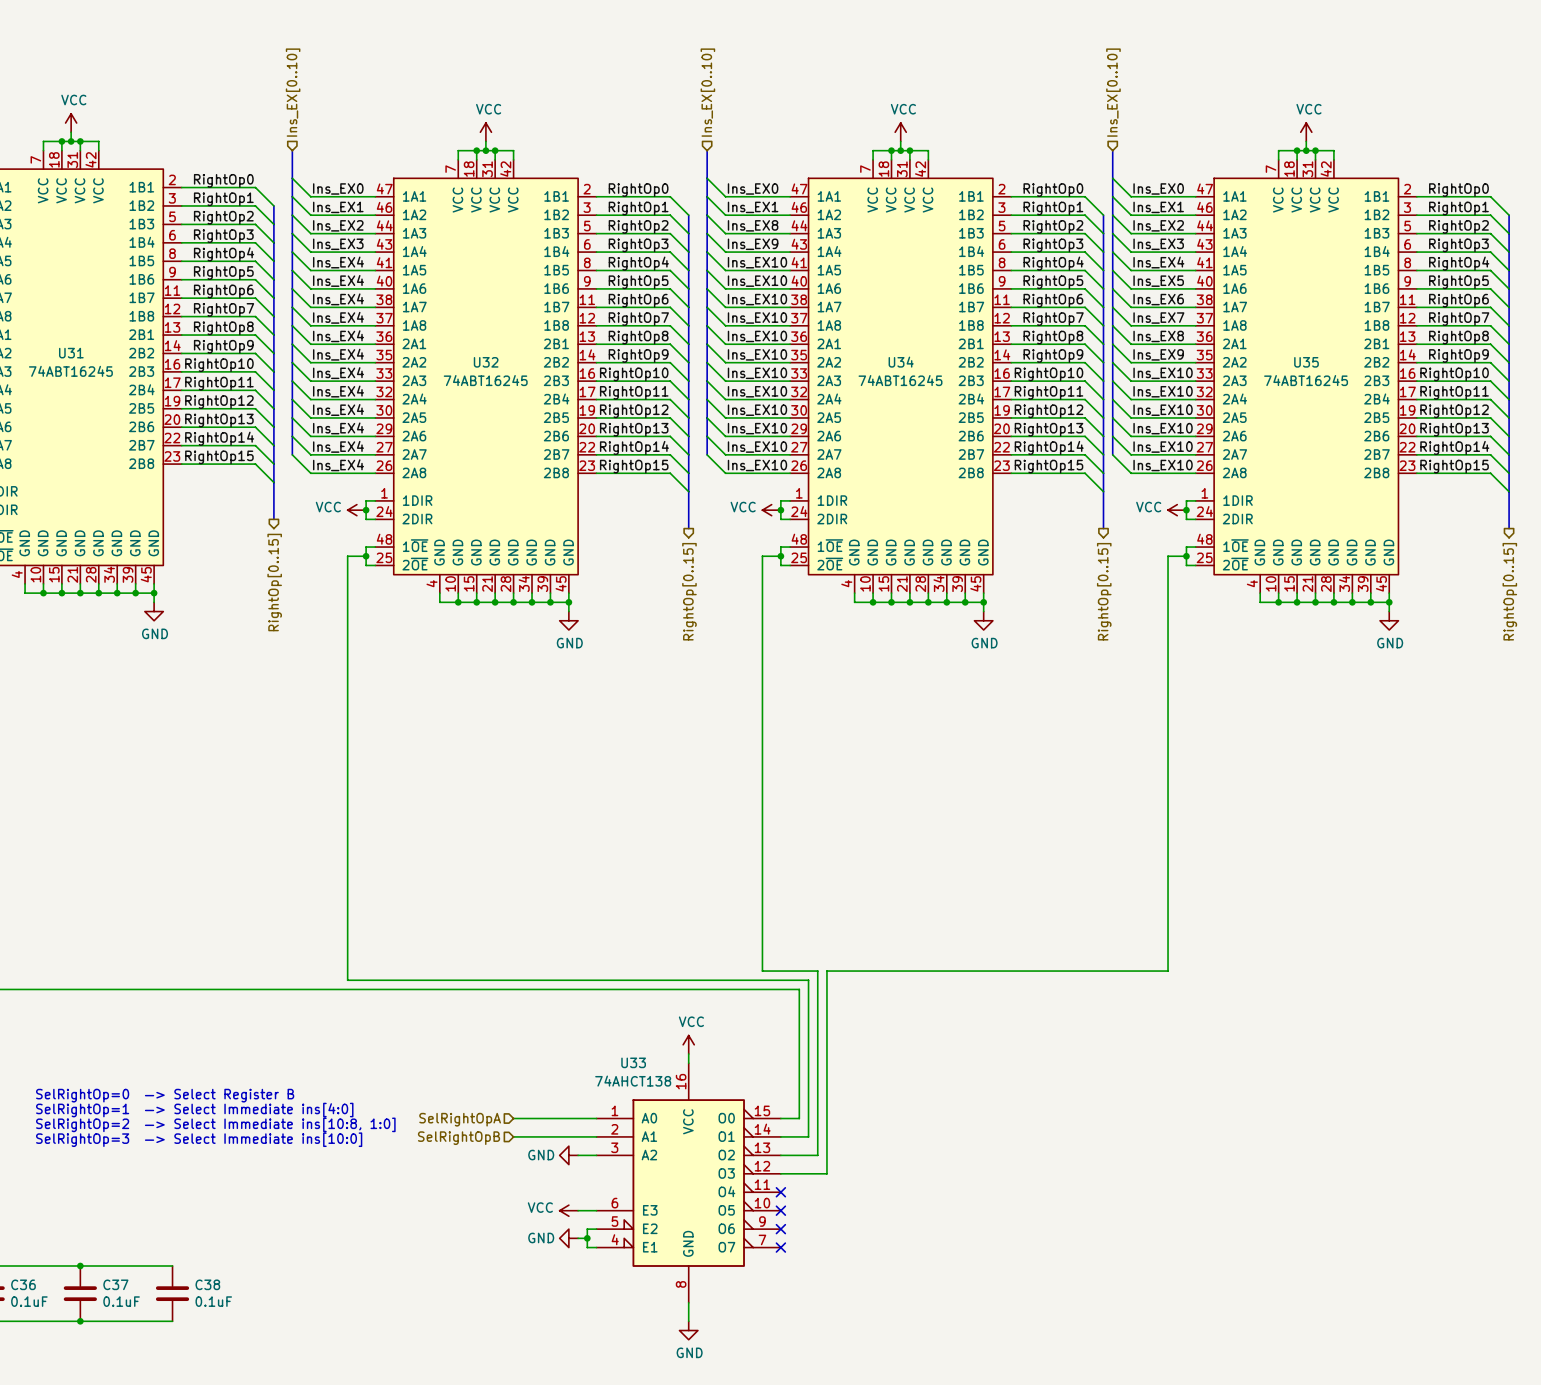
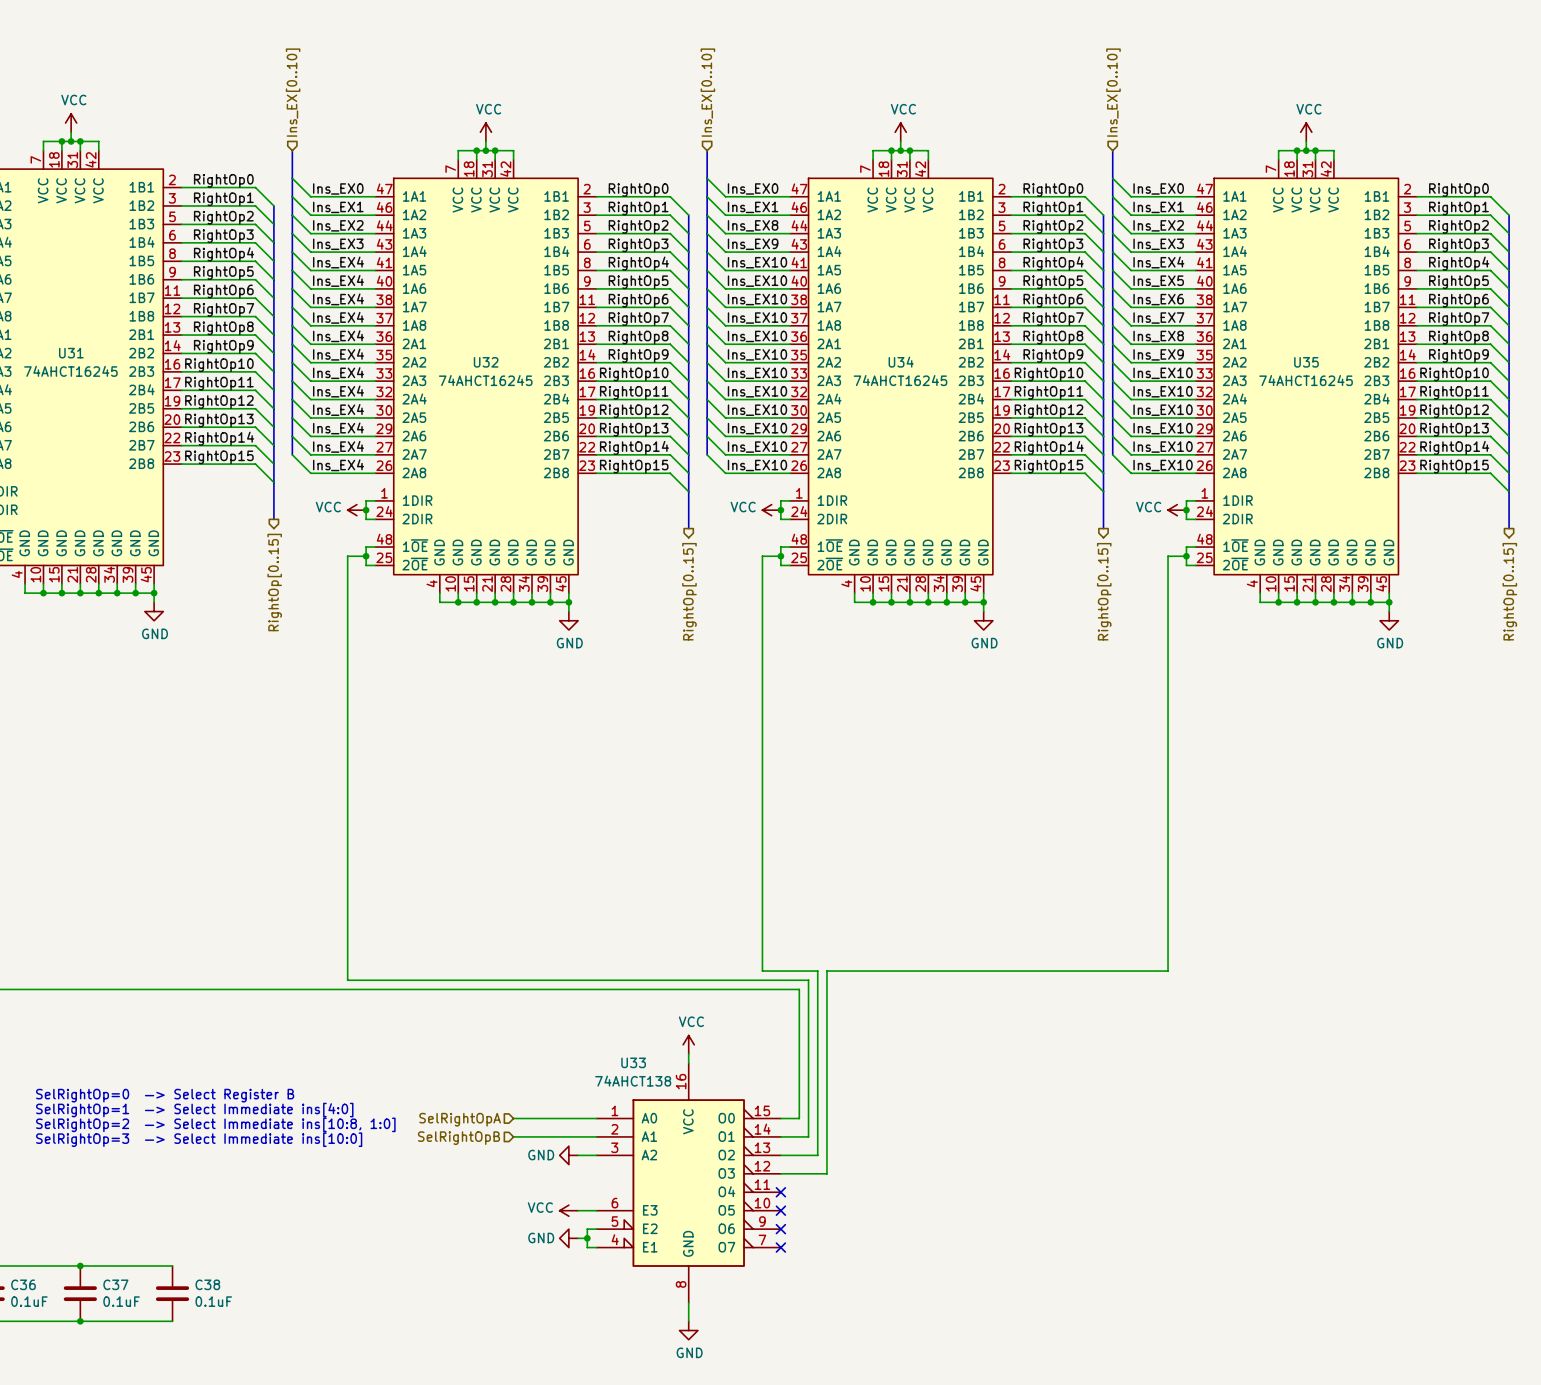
U31 value: 74ABT16245 (70, 371) -> 74AHCT16245 (70, 371)
U32 value: 74ABT16245 (485, 380) -> 74AHCT16245 (485, 380)
U34 value: 74ABT16245 (900, 380) -> 74AHCT16245 (900, 380)
U35 value: 74ABT16245 (1306, 380) -> 74AHCT16245 (1306, 380)

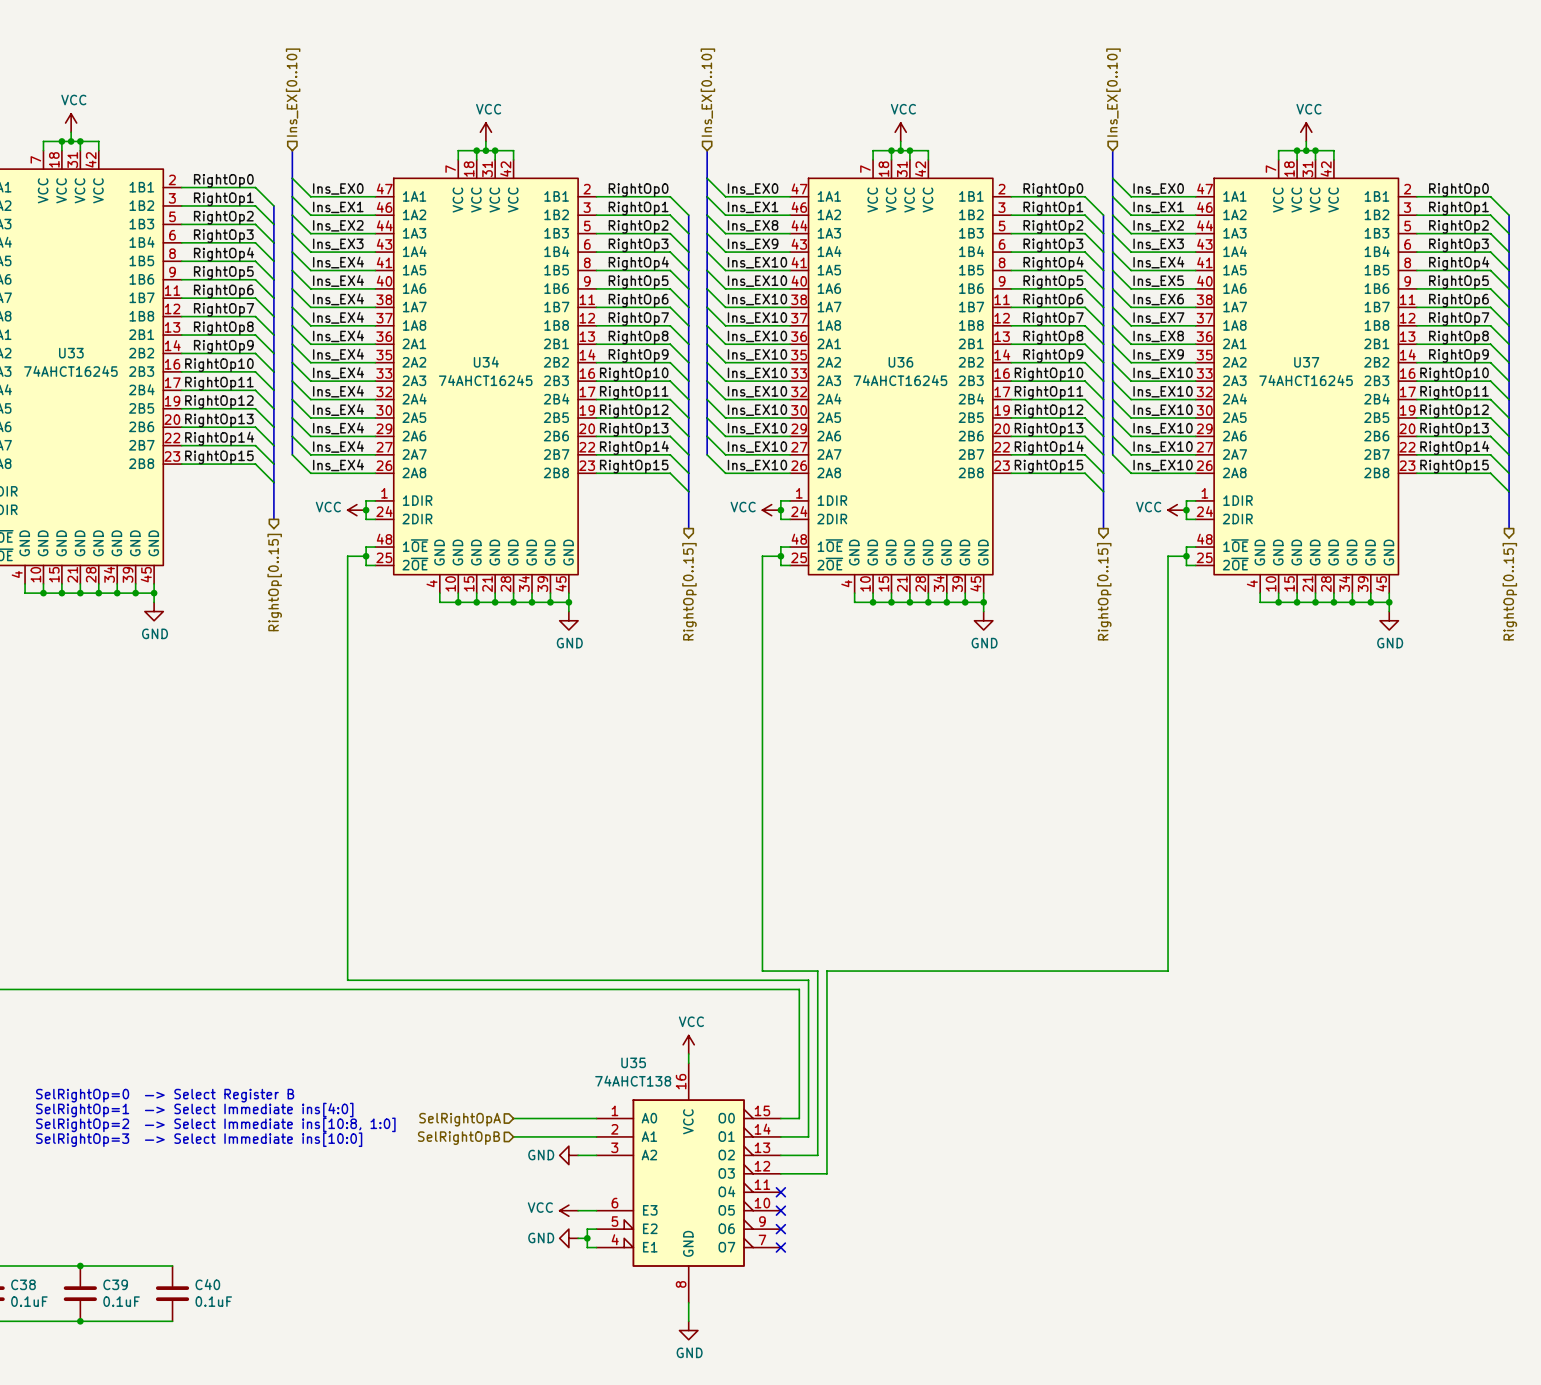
U31 name: U31 (71, 353) -> U33 (71, 353)
U32 name: U32 (486, 362) -> U34 (486, 362)
U34 name: U34 (901, 362) -> U36 (900, 362)
U35 name: U35 (1306, 362) -> U37 (1306, 362)
U33 name: U33 (633, 1062) -> U35 (633, 1062)
C36 name: C36 (23, 1284) -> C38 (23, 1284)
C37 name: C37 (115, 1284) -> C39 (115, 1284)
C38 name: C38 (207, 1284) -> C40 (207, 1284)

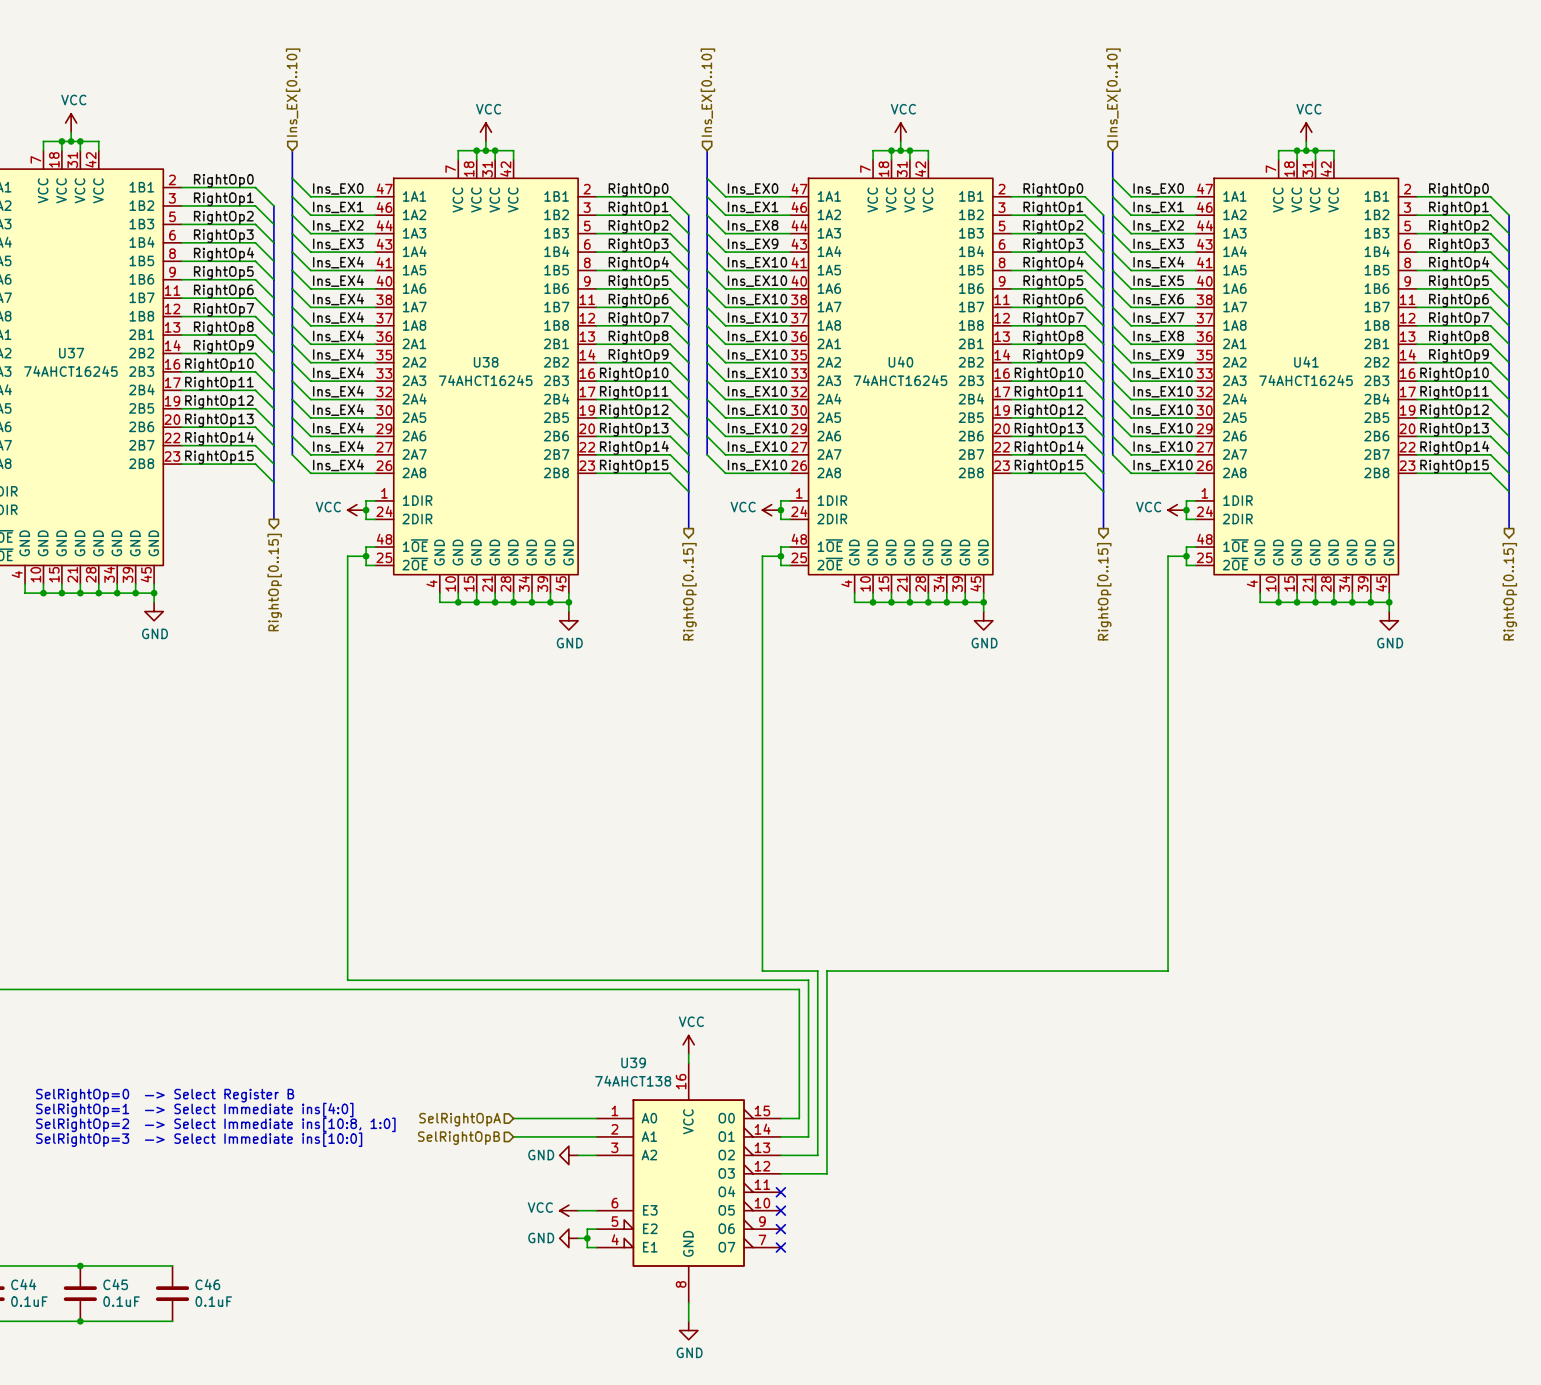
U33 name: U33 (71, 353) -> U37 (71, 353)
U34 name: U34 (486, 362) -> U38 (486, 362)
U36 name: U36 (900, 362) -> U40 (900, 362)
U37 name: U37 (1306, 362) -> U41 (1306, 362)
U35 name: U35 (633, 1062) -> U39 (633, 1062)
C38 name: C38 (23, 1284) -> C44 (23, 1284)
C39 name: C39 (115, 1284) -> C45 (115, 1284)
C40 name: C40 (207, 1284) -> C46 (207, 1284)

